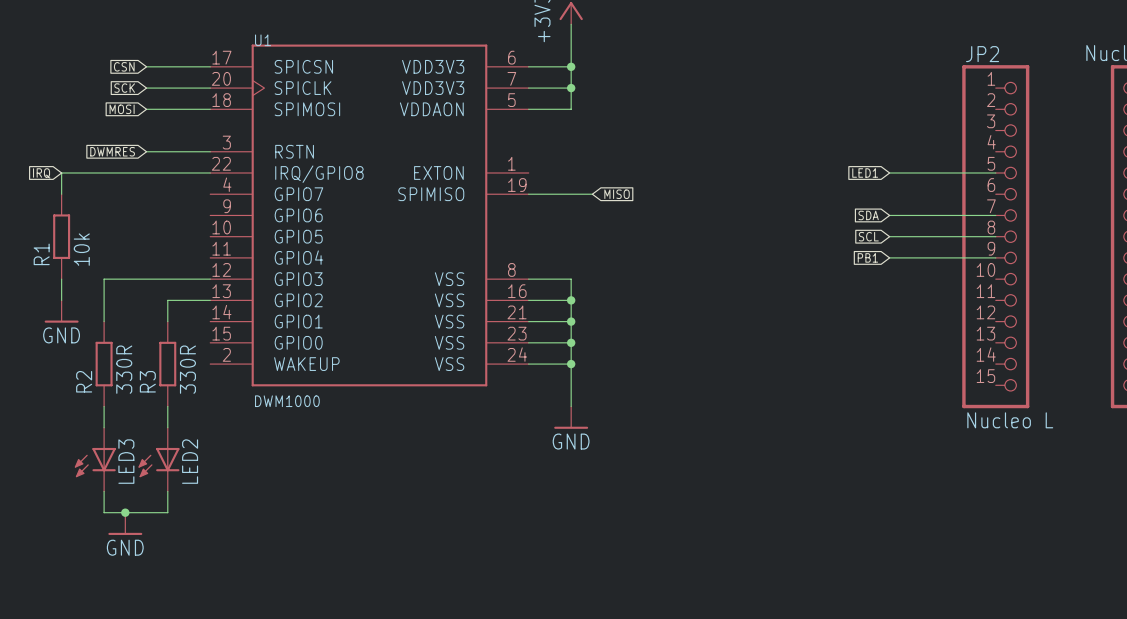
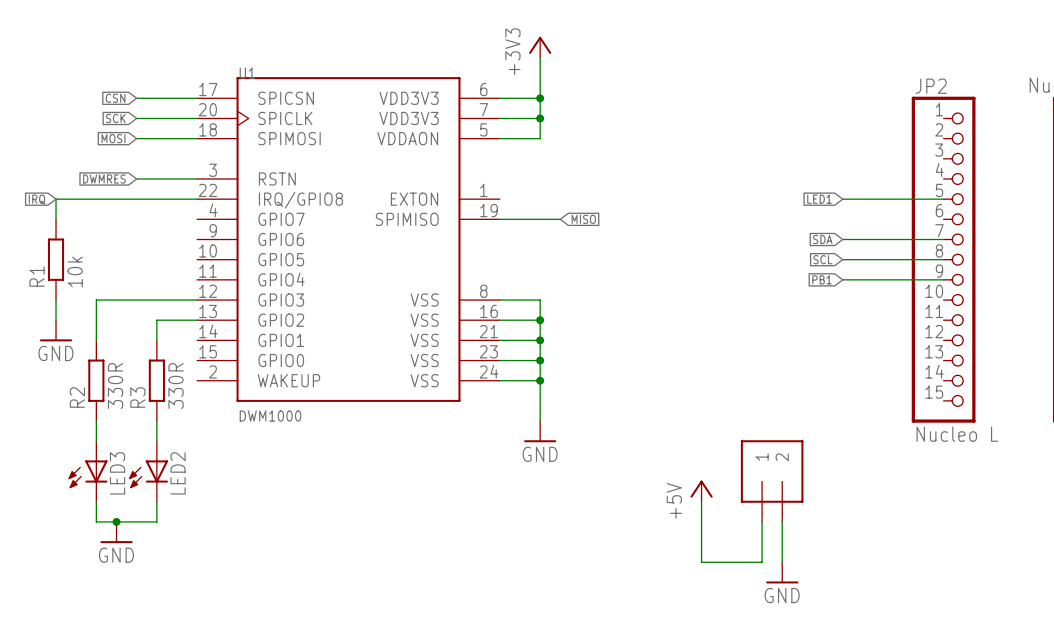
part: none -> (772, 481)
power symbol: none -> +5V (701, 491)
wire: none -> (701, 501) (701, 562) (762, 562) (762, 521)
wire: none -> (782, 521) (782, 562)
power symbol: none -> GND (782, 572)

